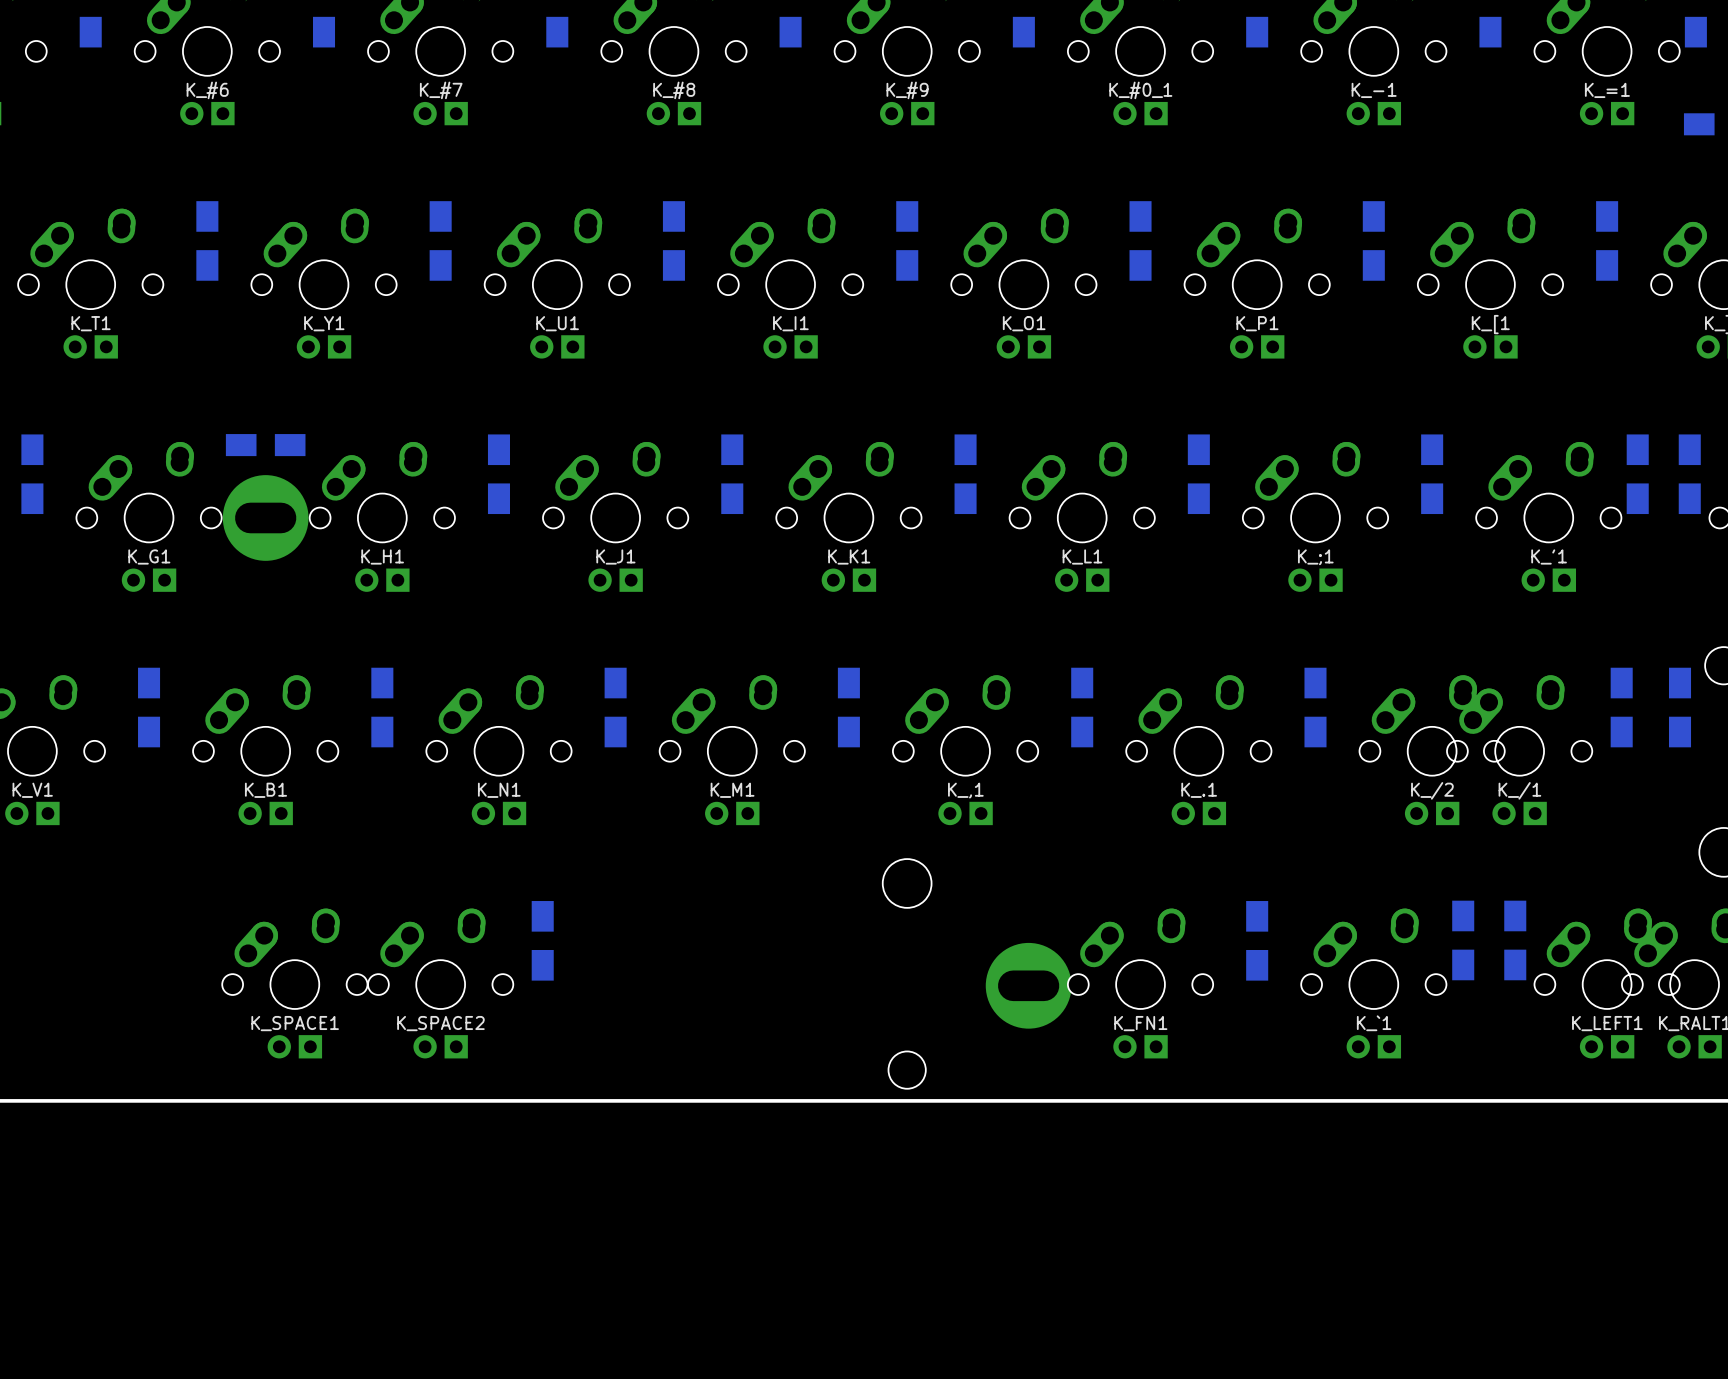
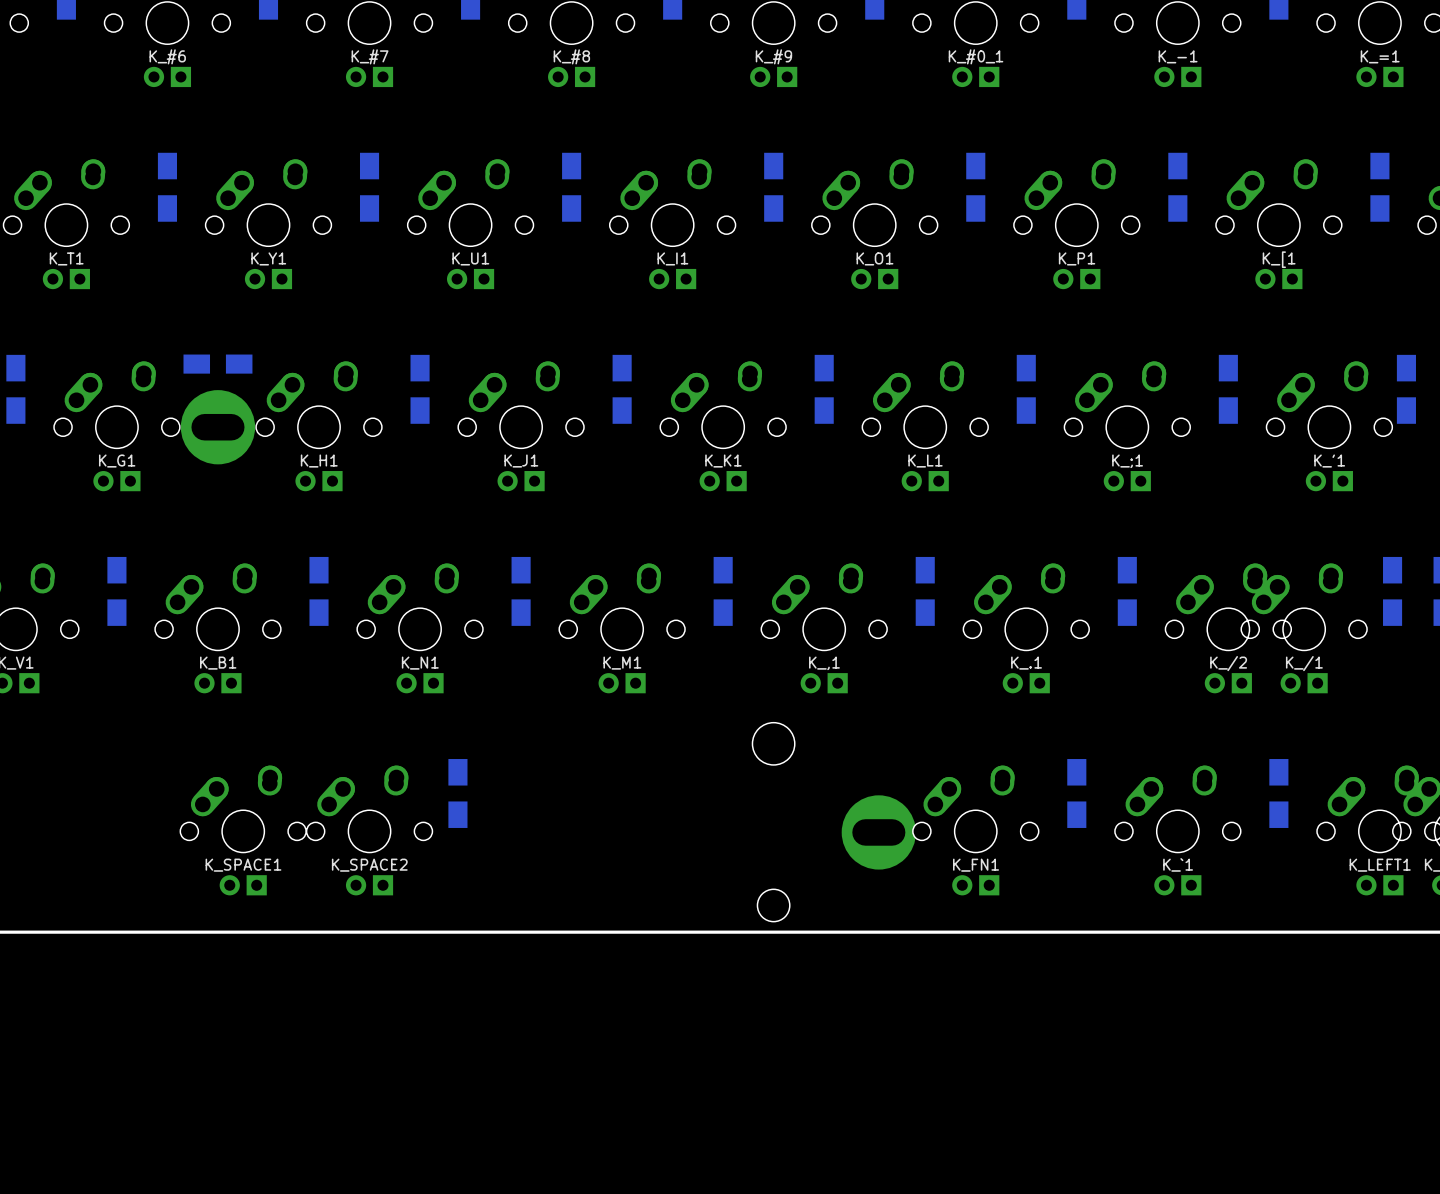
part: (1463, 940) -> none
part: none -> (1278, 793)
part: (1515, 940) -> none

